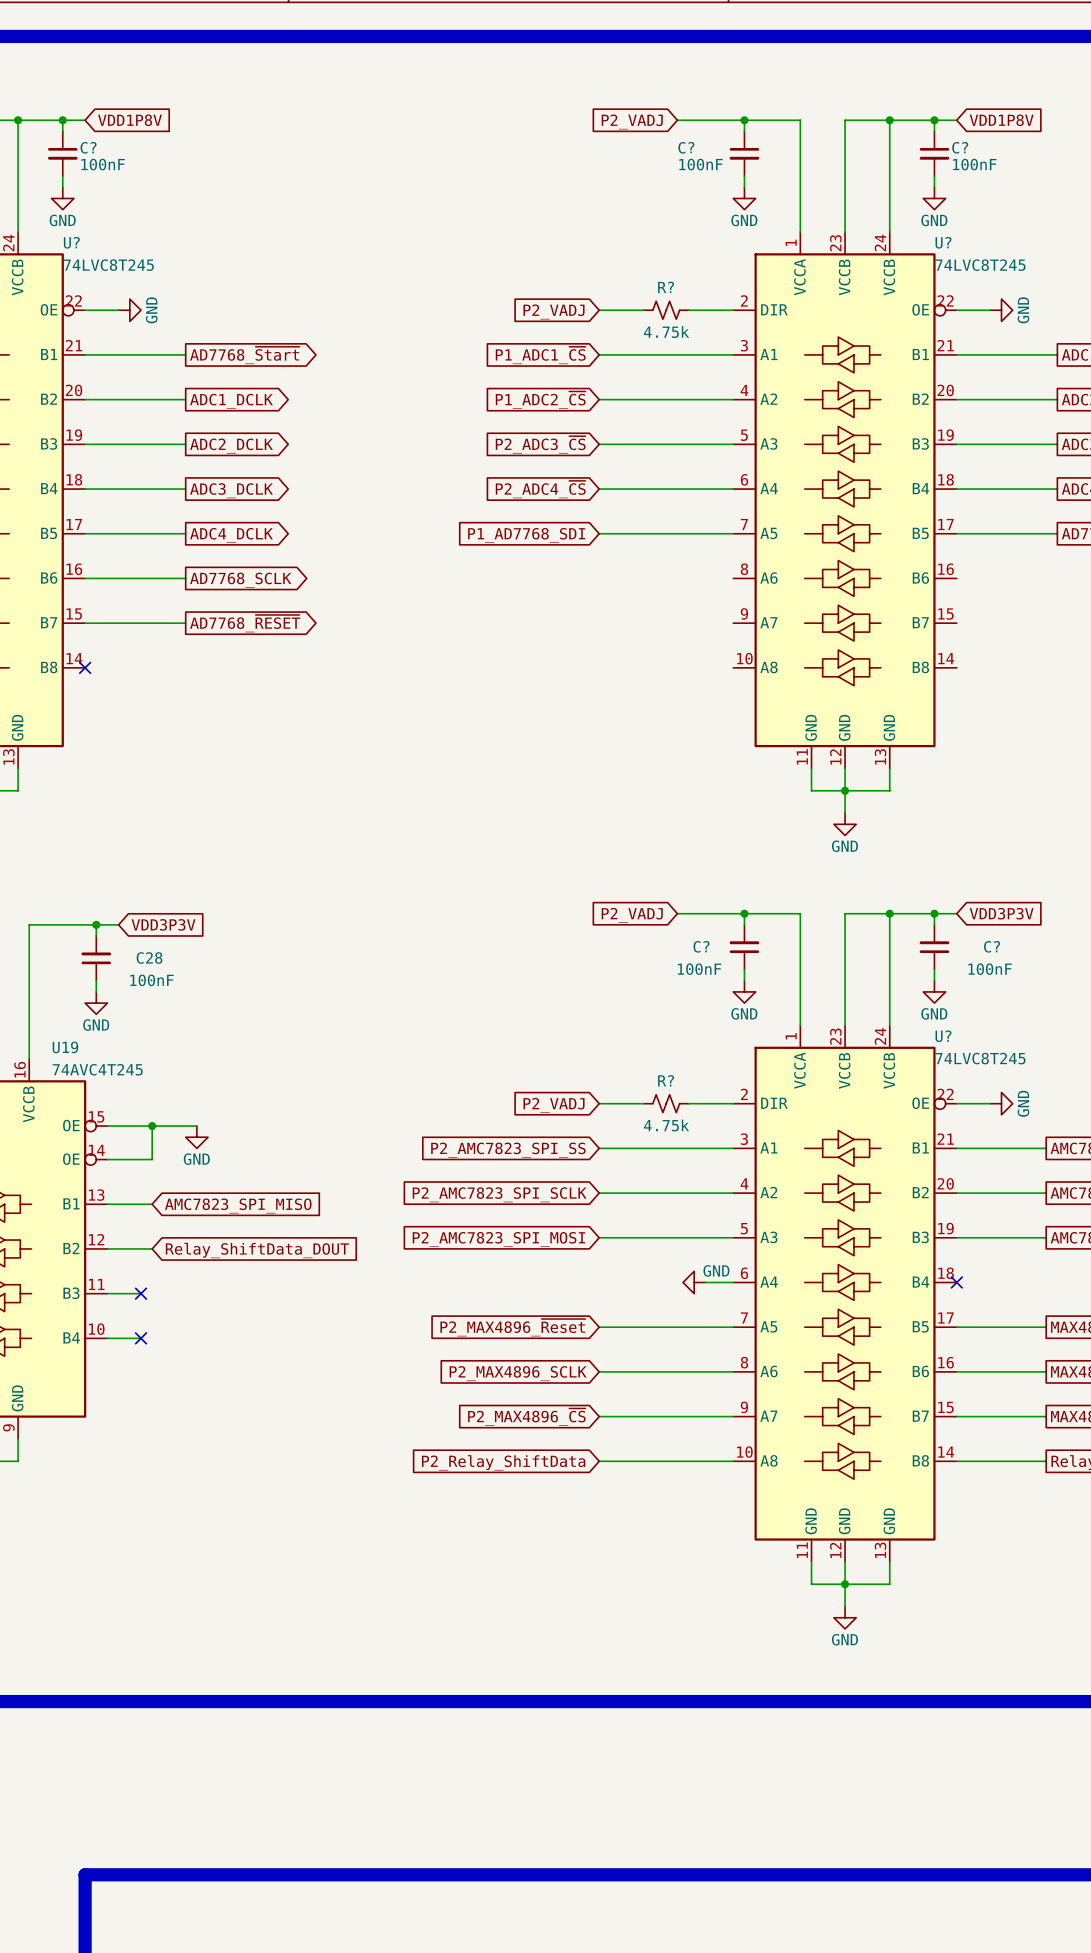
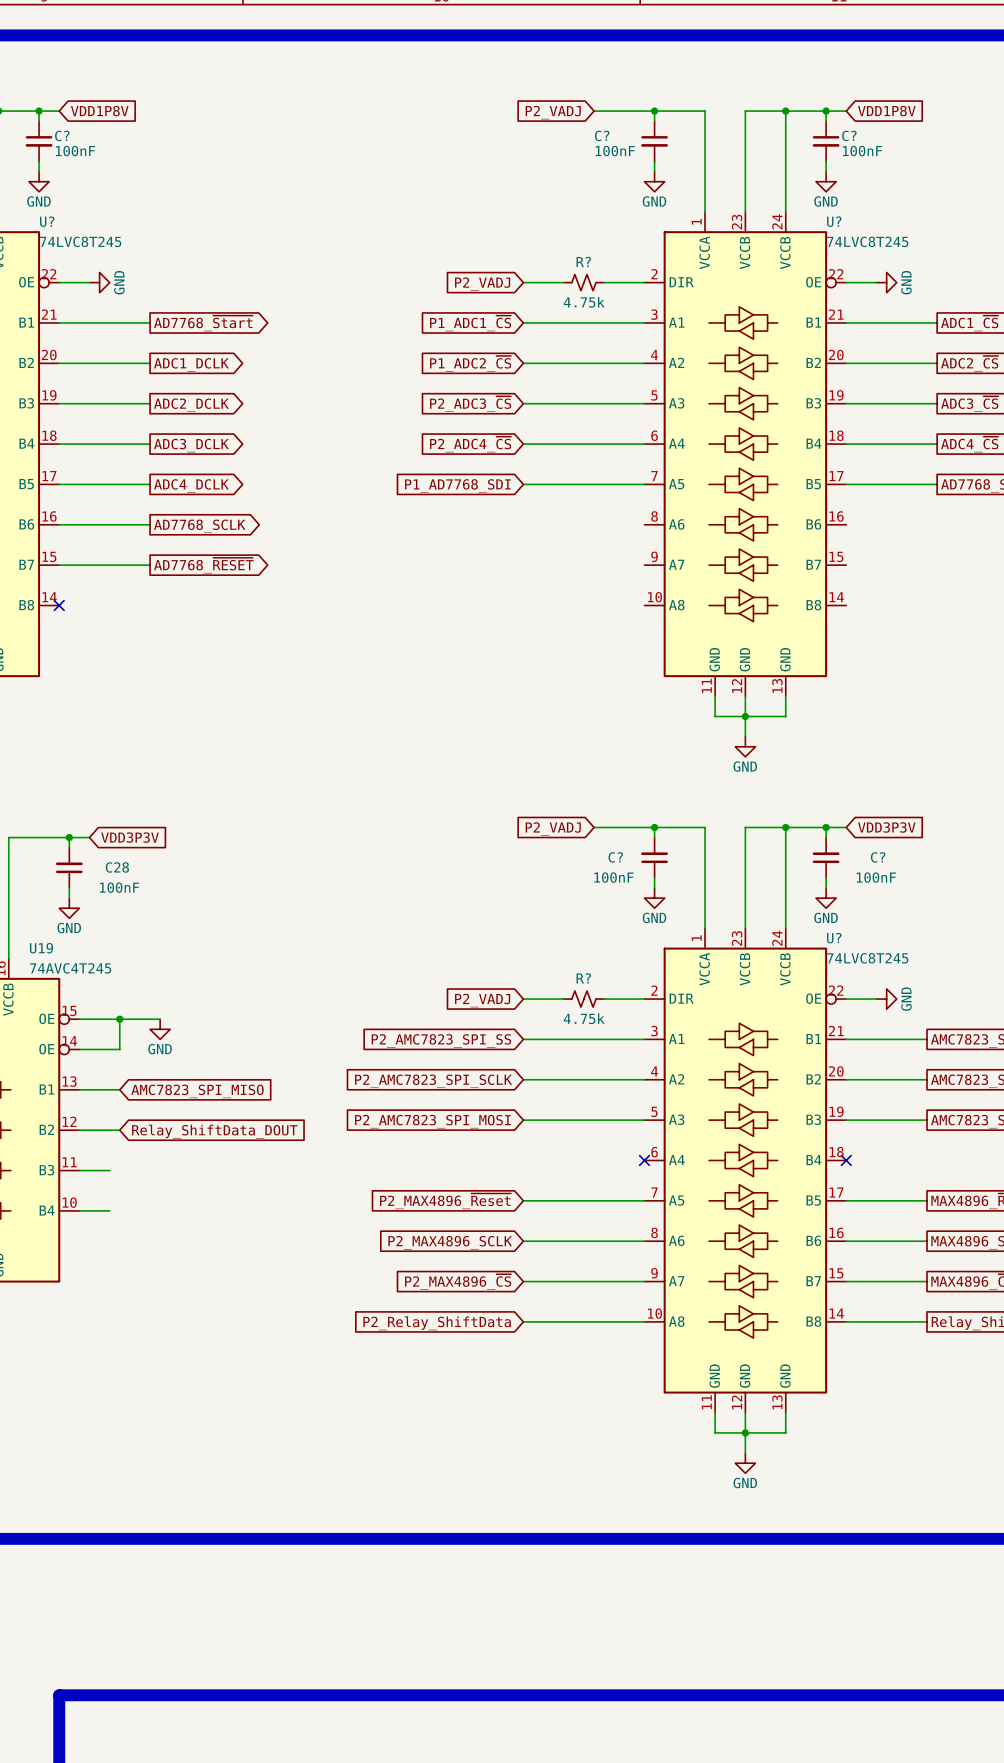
power symbol: GND (694, 1282) -> none
wire: (705, 1282) (733, 1282) -> none
no-connect mark: none -> (644, 1160)
no-connect mark: (141, 1293) -> none
no-connect mark: (141, 1338) -> none

